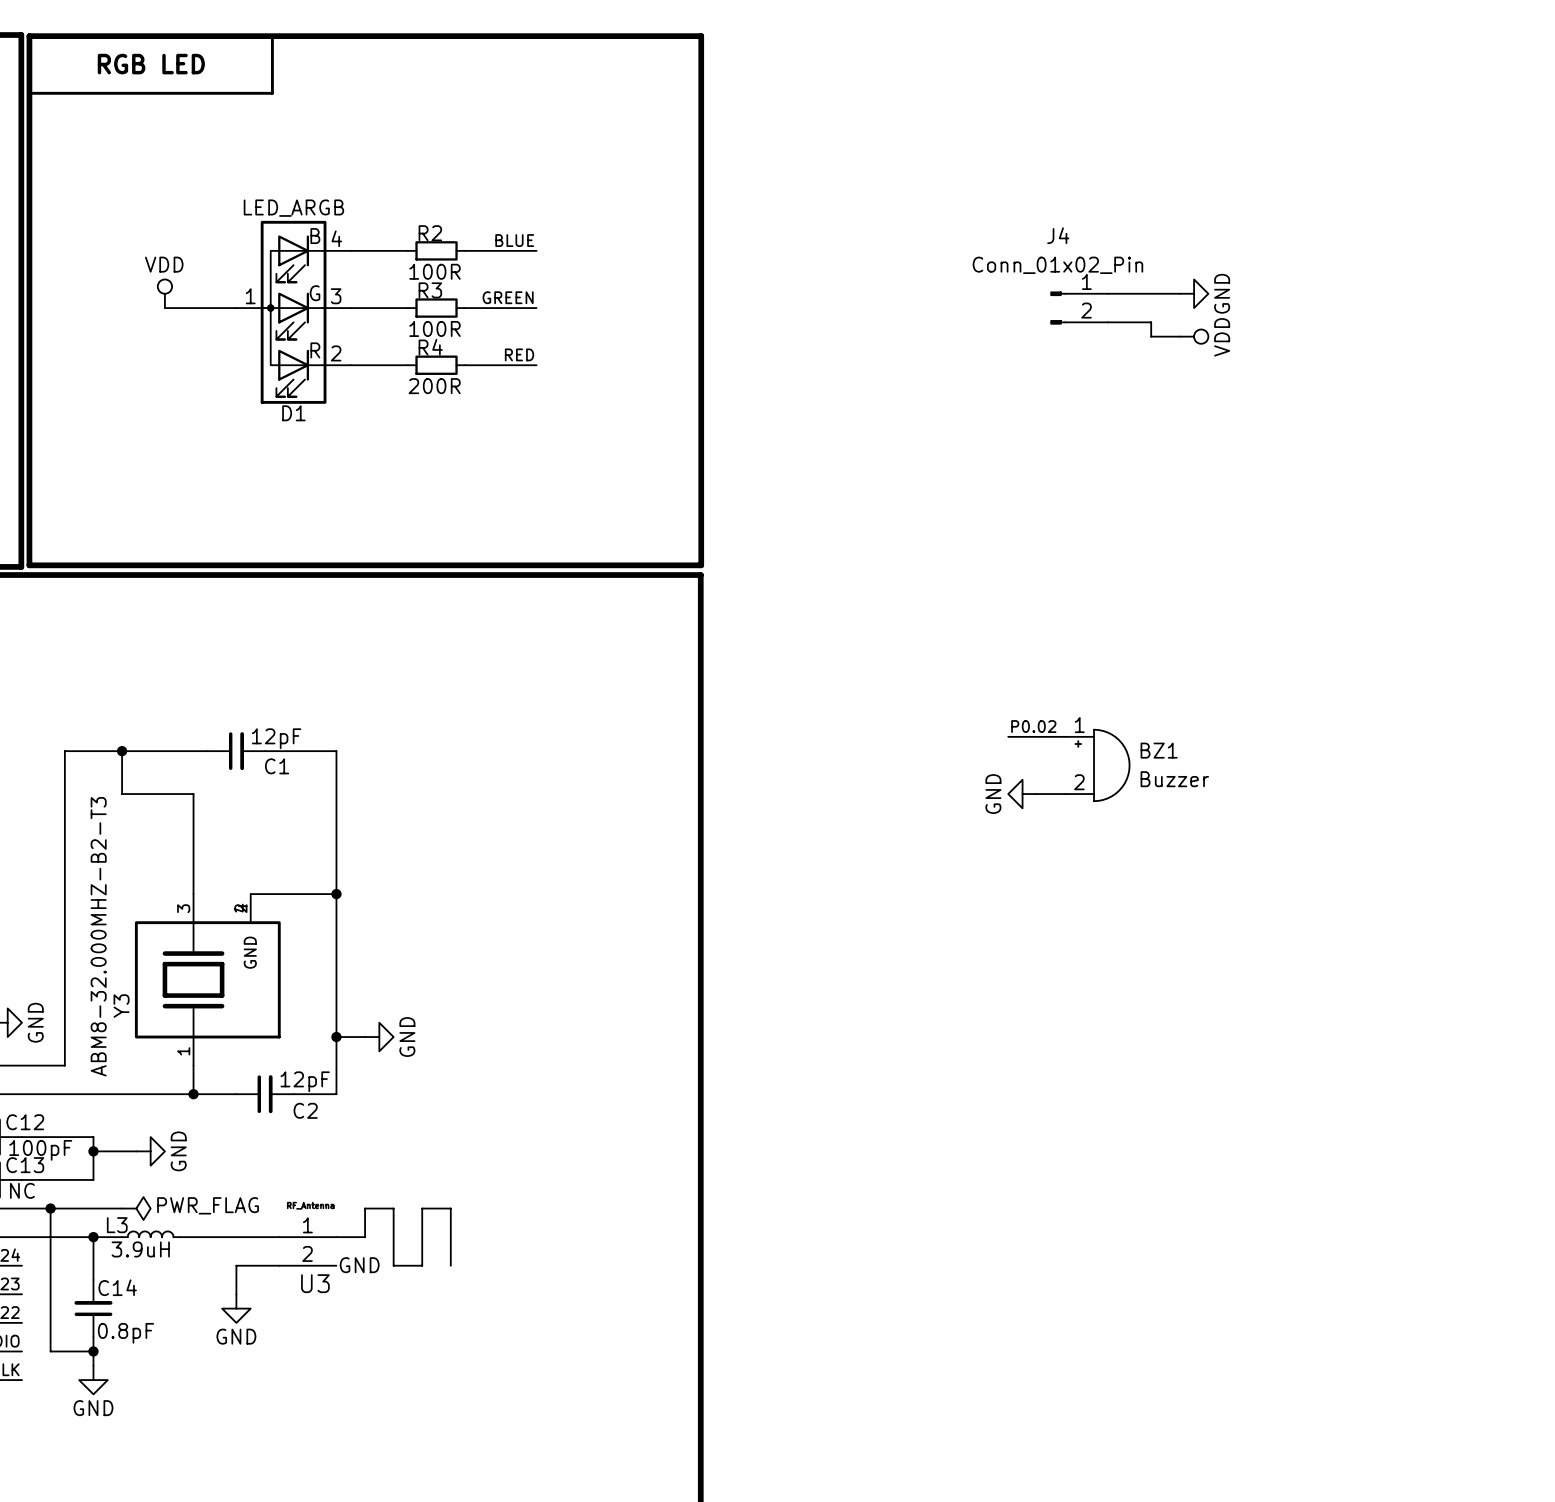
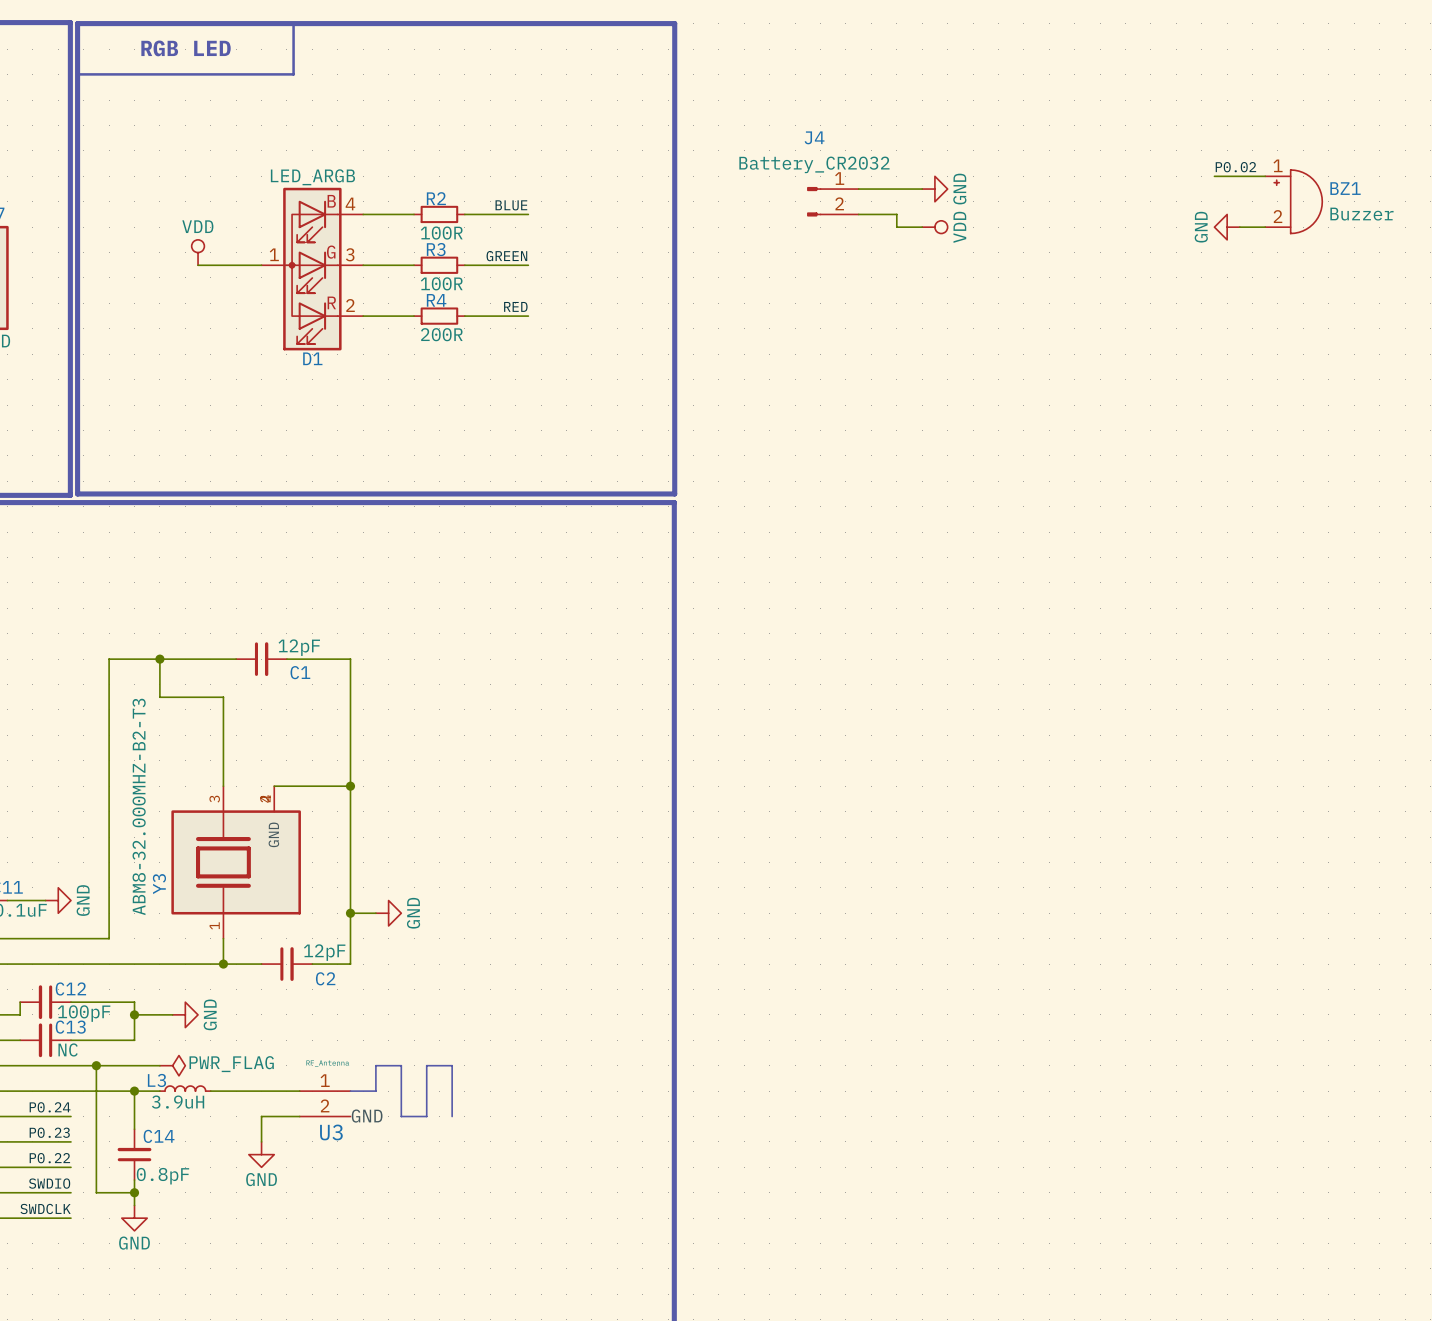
label: none -> P0.02 (1235, 167)
wire: none -> (1214, 176) (1265, 176)
power symbol: none -> GND (934, 189)
J4 value: Conn_01x02_Pin (1057, 265) -> Battery_CR2032 (814, 164)
power symbol: none -> GND (1227, 227)
wire: none -> (1239, 227) (1265, 227)
wire: (1108, 293) (1179, 293) -> (858, 189) (922, 189)
power symbol: GND (1194, 293) -> none
J4 position: (1079, 308) -> (832, 201)
wire: (1108, 322) (1151, 322) (1151, 336) (1179, 336) -> (858, 214) (896, 214) (896, 227) (922, 227)
power symbol position: VDD (1194, 336) -> VDD (934, 227)
label: P0.02 (1033, 726) -> none
wire: (1008, 736) (1065, 736) -> none
BZ1 position: (1097, 765) -> (1293, 201)
power symbol: GND (1022, 794) -> none
wire: (1036, 794) (1065, 794) -> none

